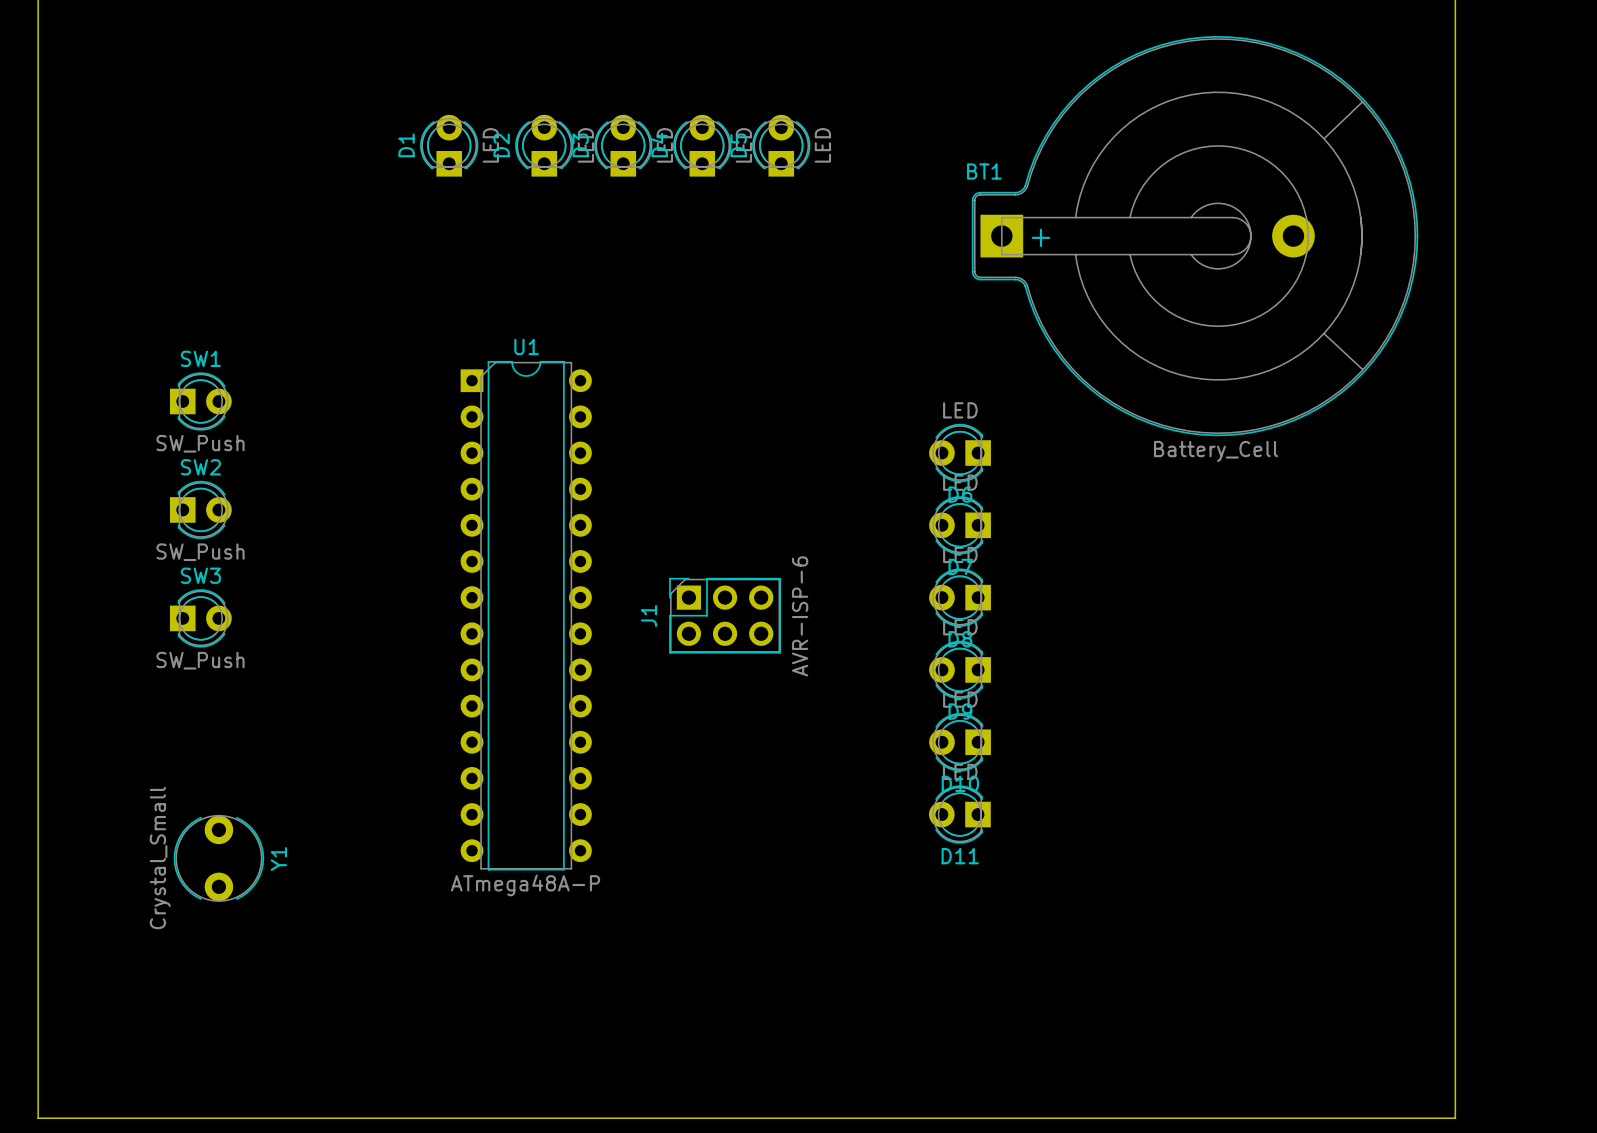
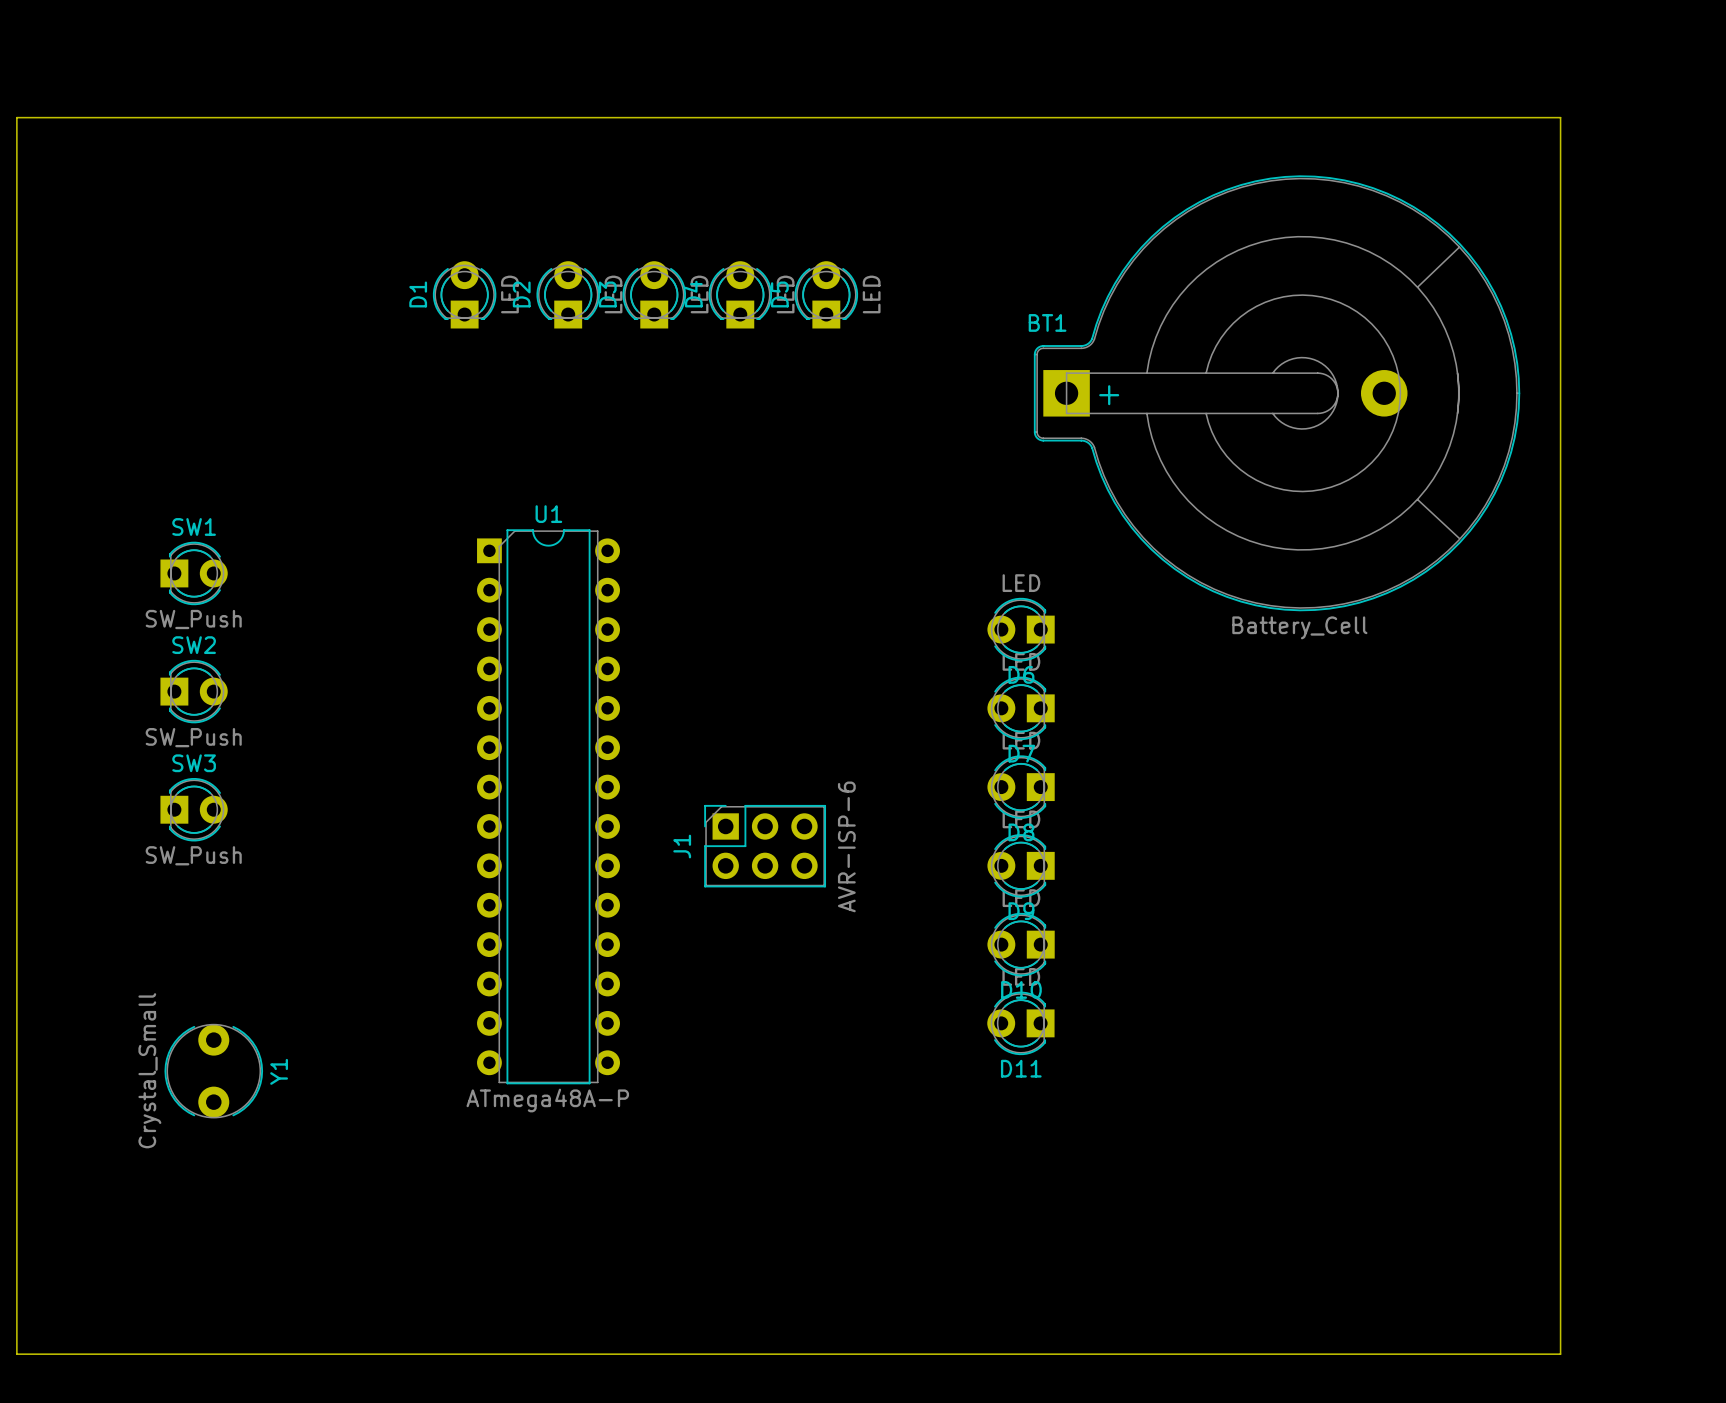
J1 position: (725, 615) -> (765, 846)

